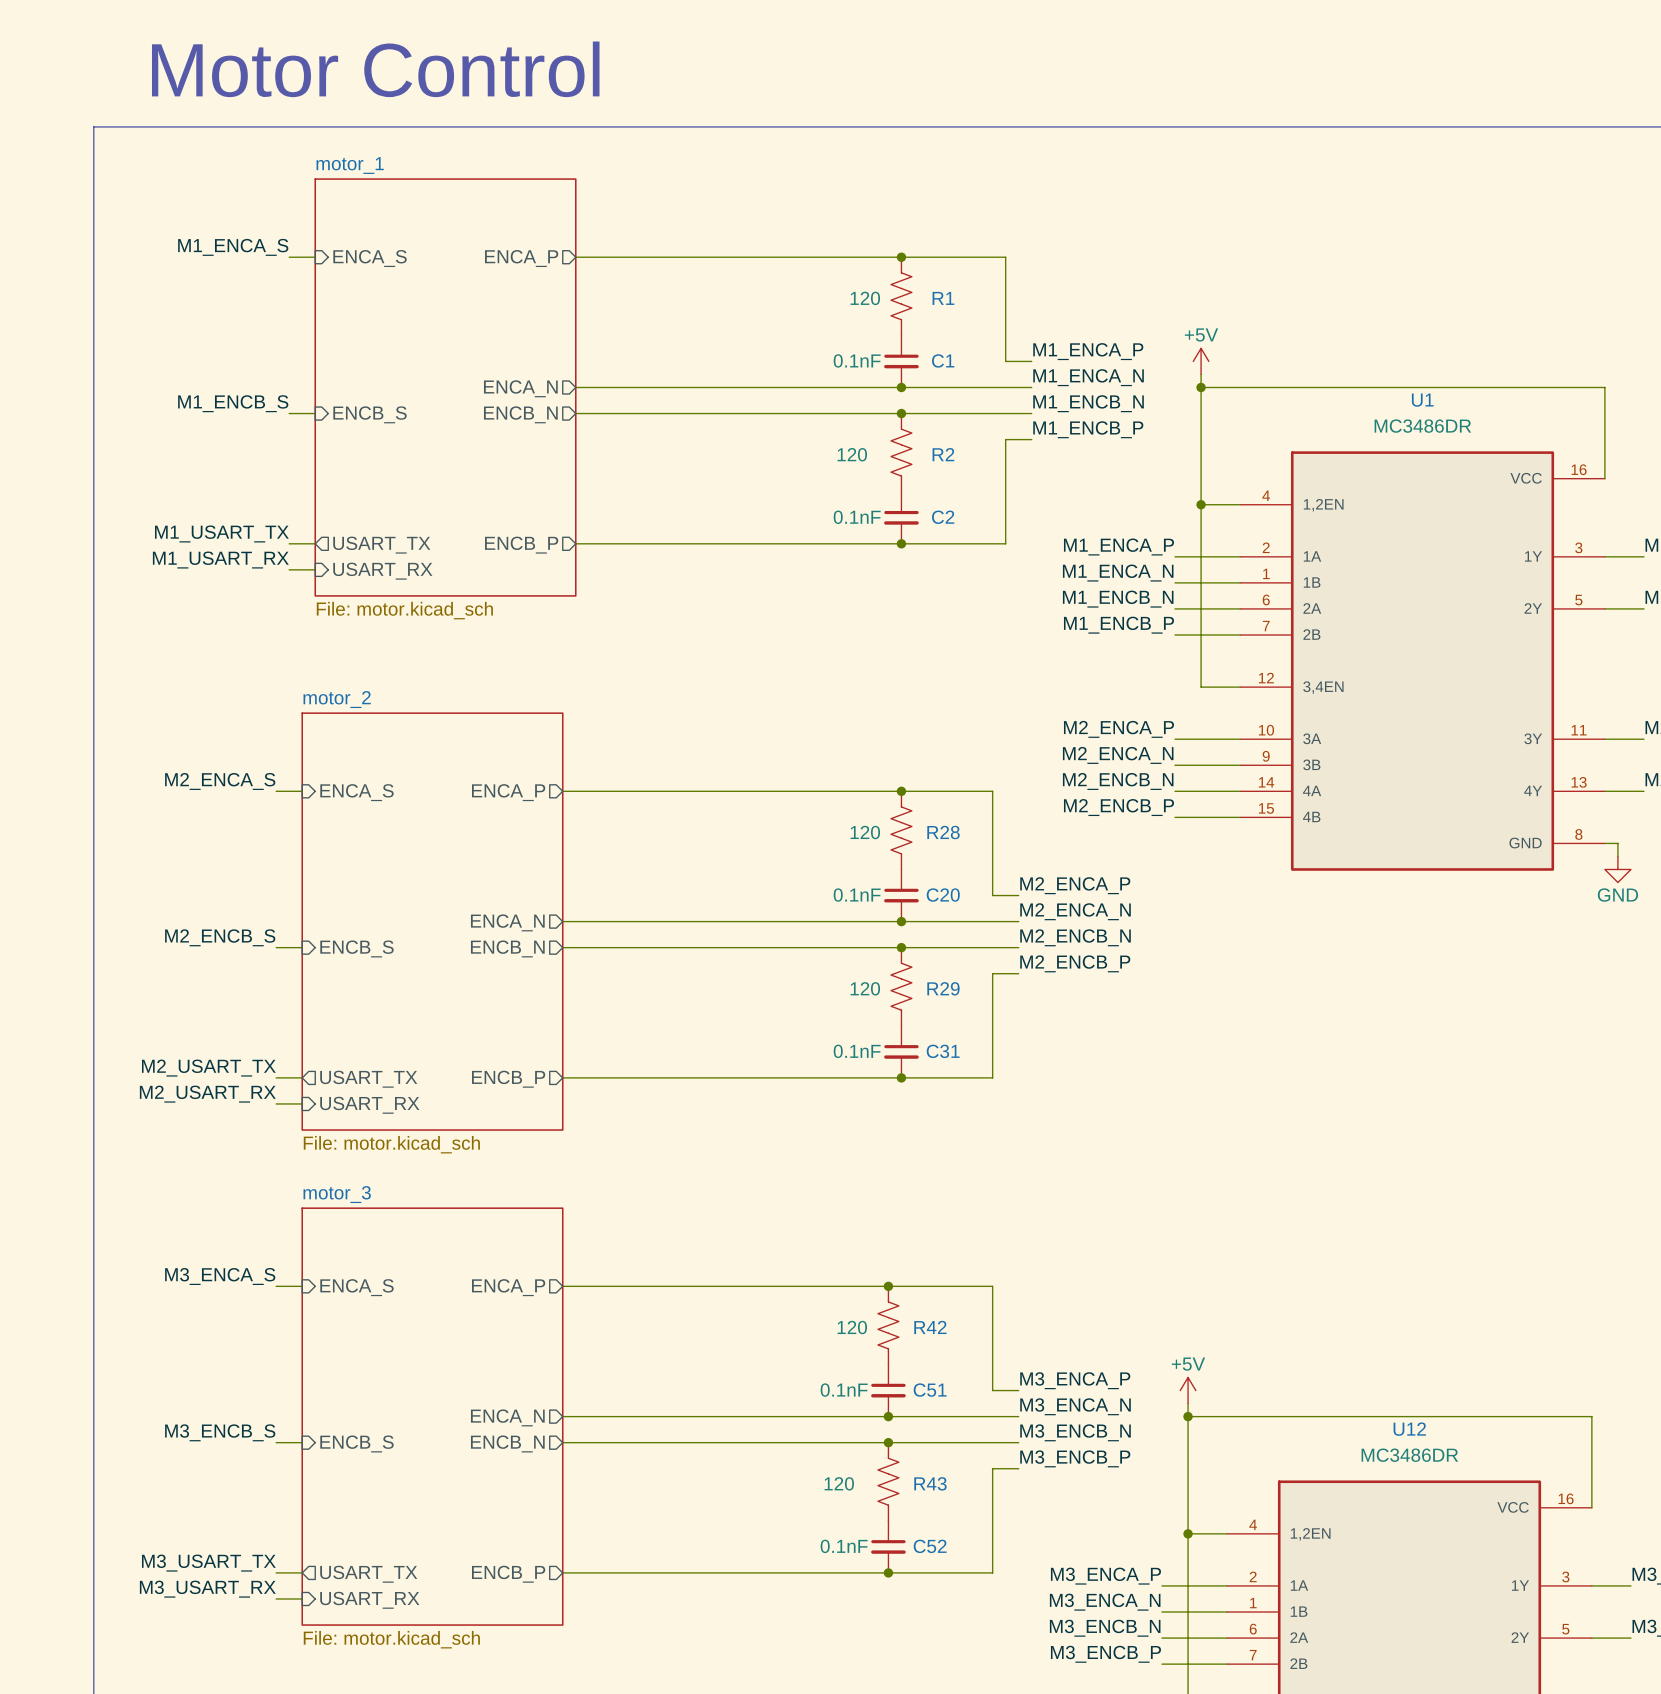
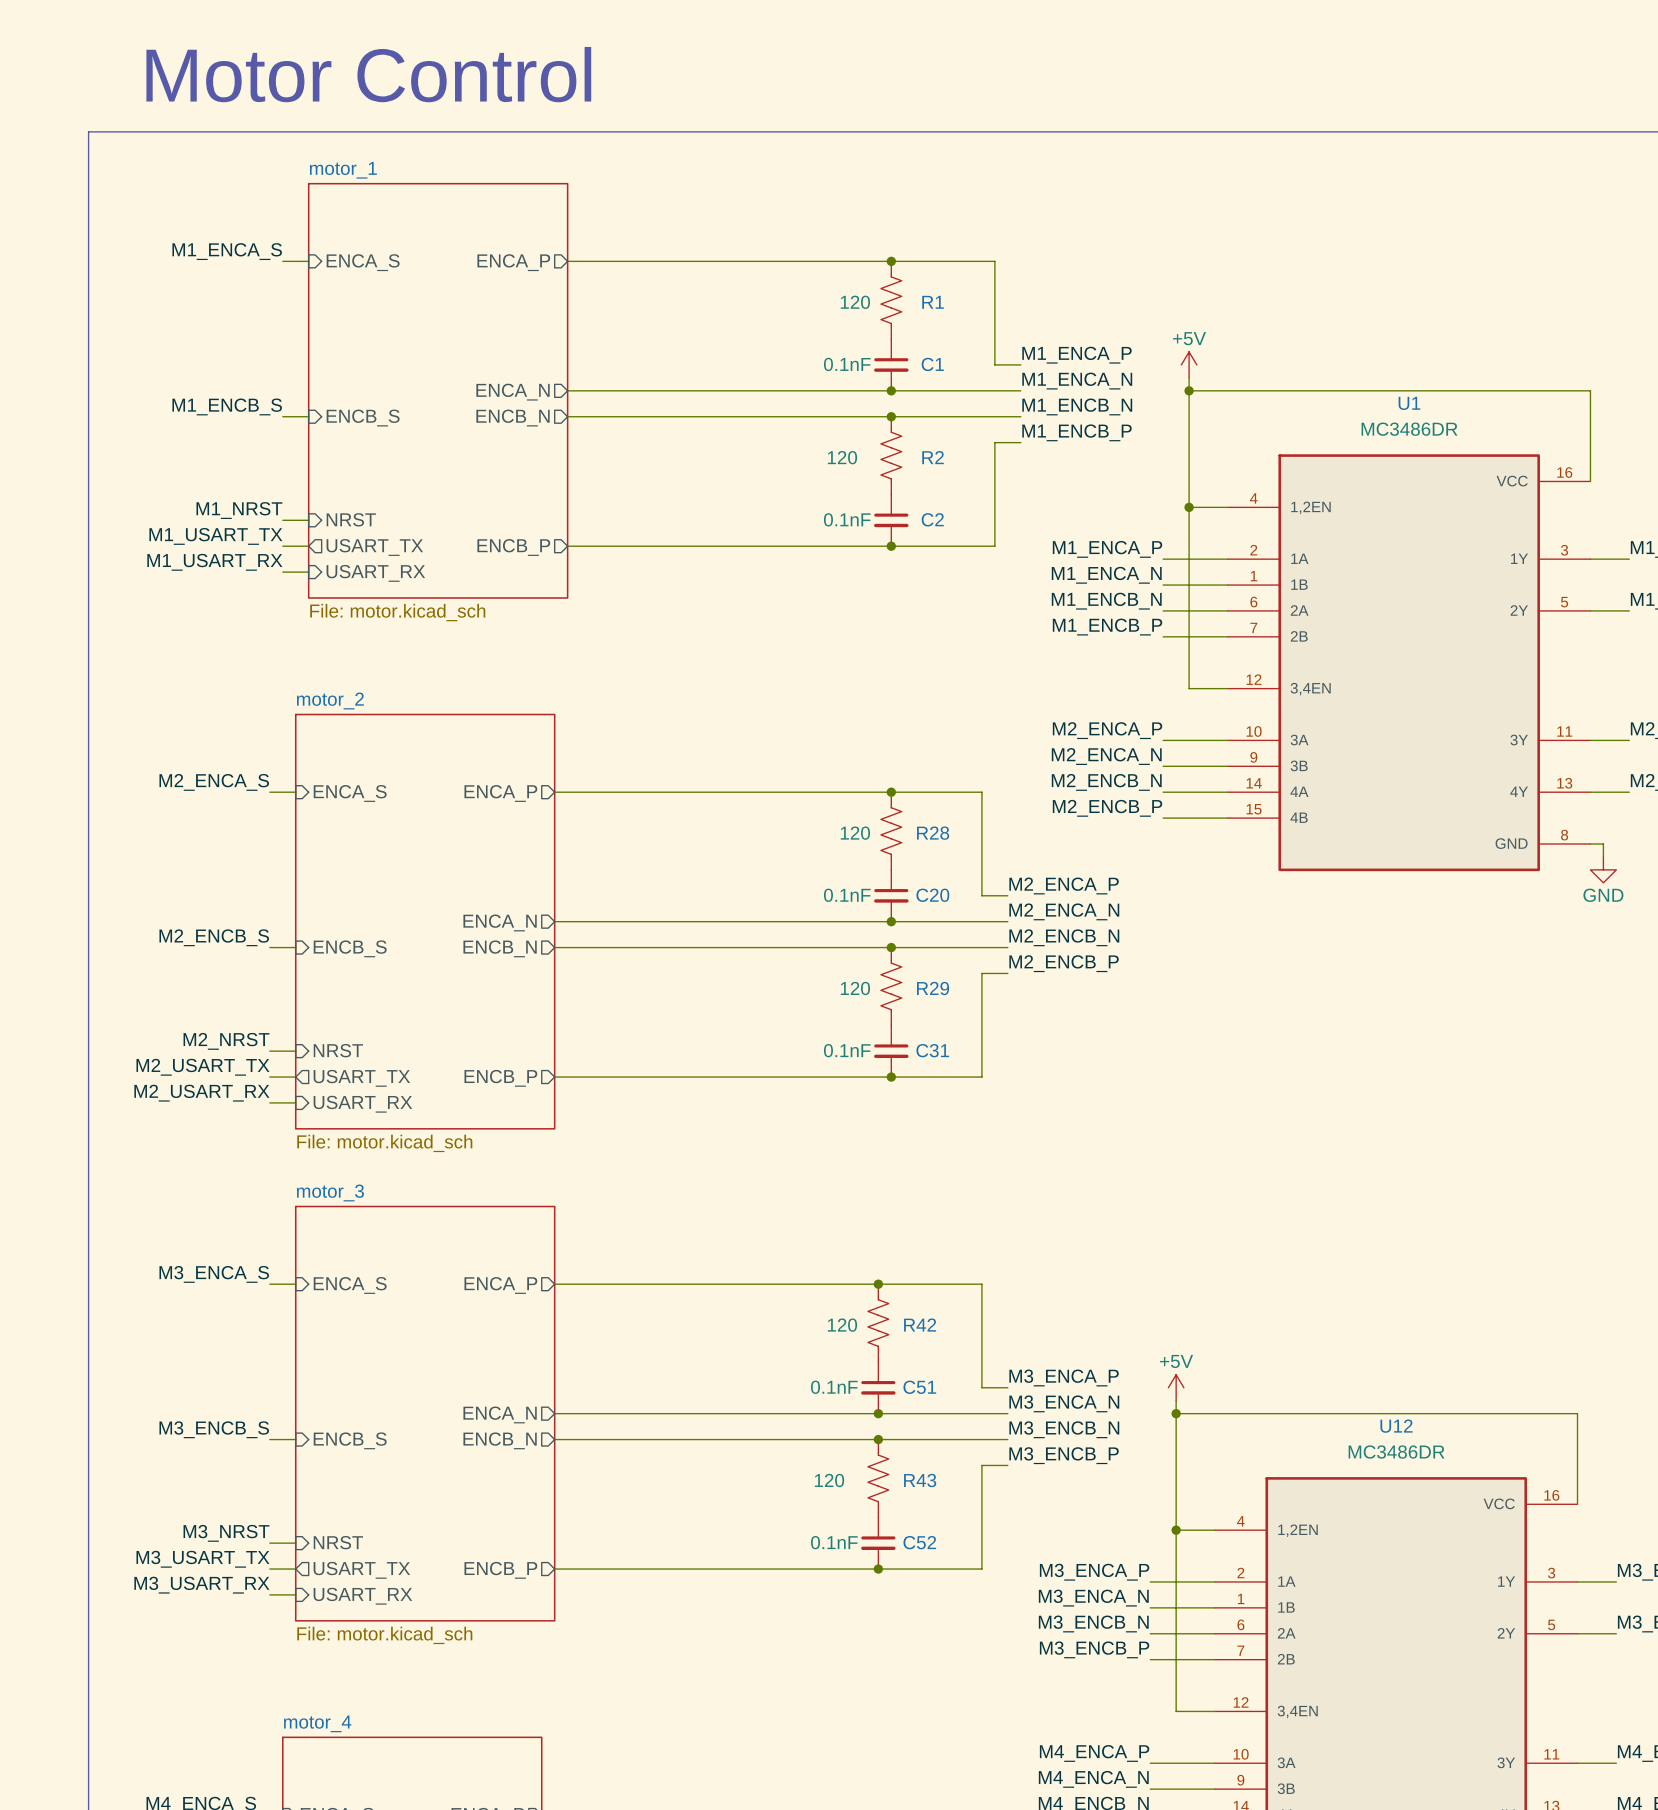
label: none -> M1_NRST (239, 510)
wire: none -> (282, 520) (308, 520)
sheet pin: none -> NRST (351, 519)
label: none -> M2_NRST (226, 1041)
wire: none -> (269, 1051) (295, 1051)
sheet pin: none -> NRST (338, 1050)
label: none -> M3_NRST (226, 1533)
wire: none -> (269, 1543) (295, 1543)
sheet pin: none -> NRST (338, 1542)

